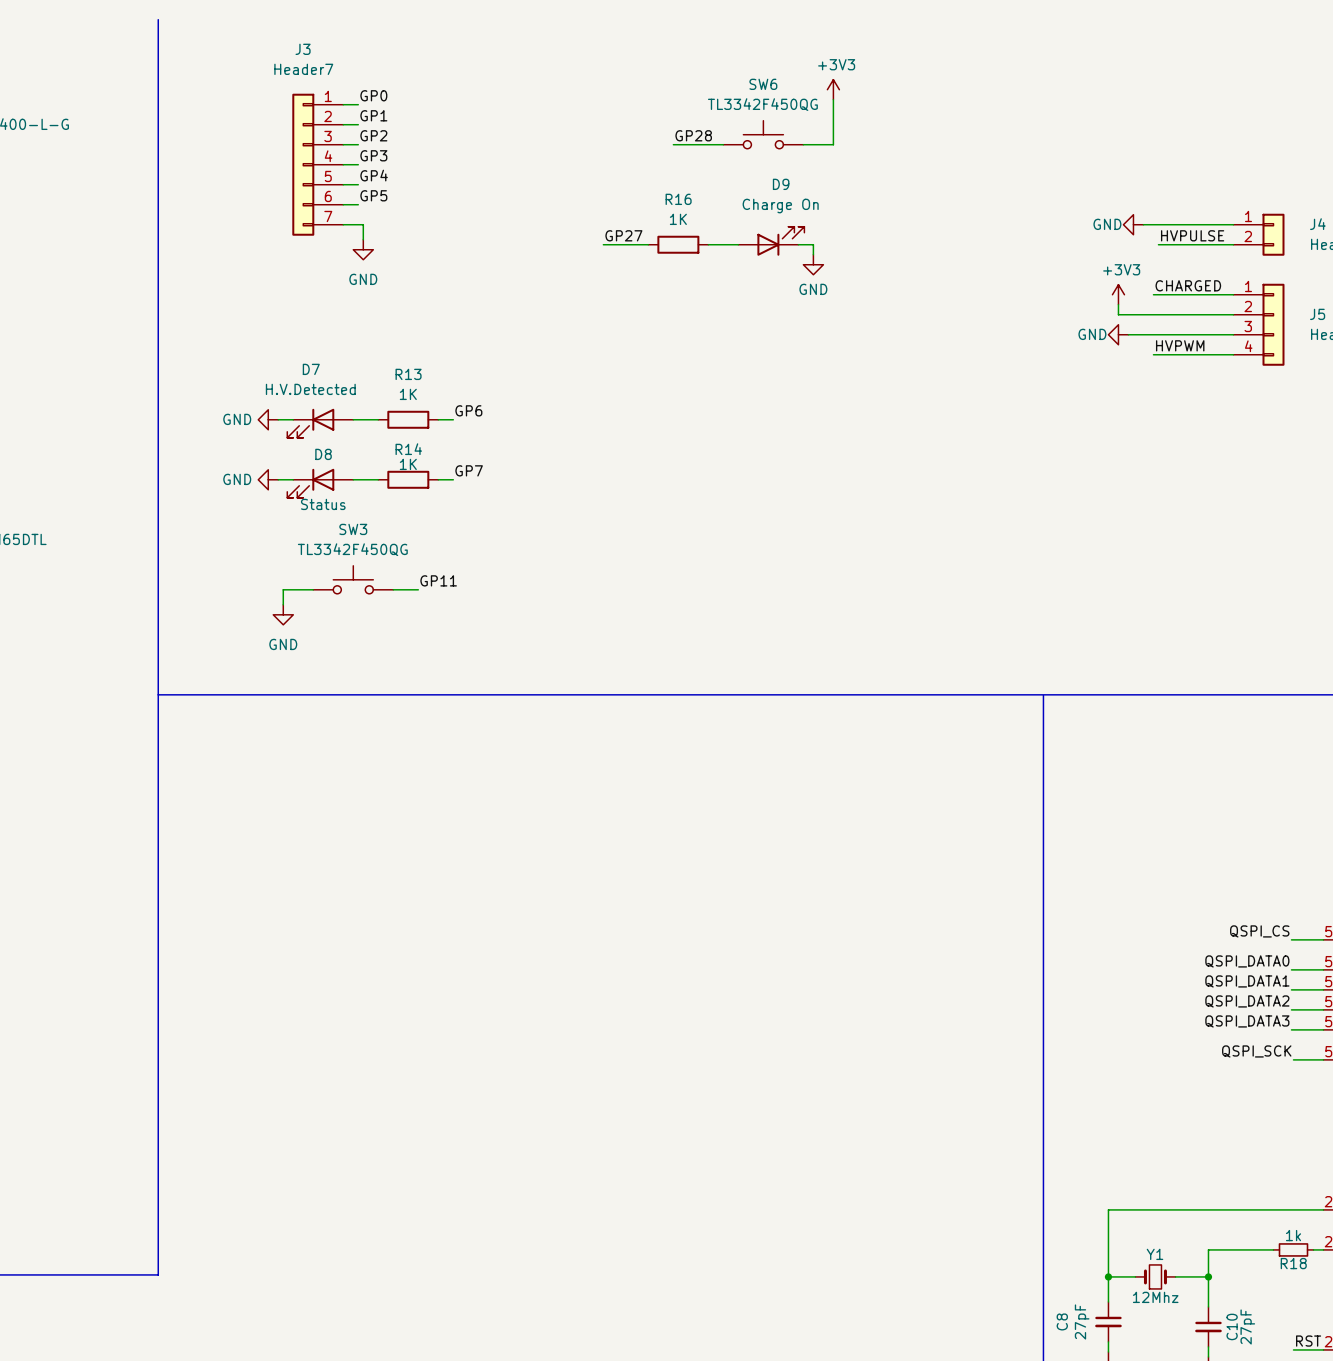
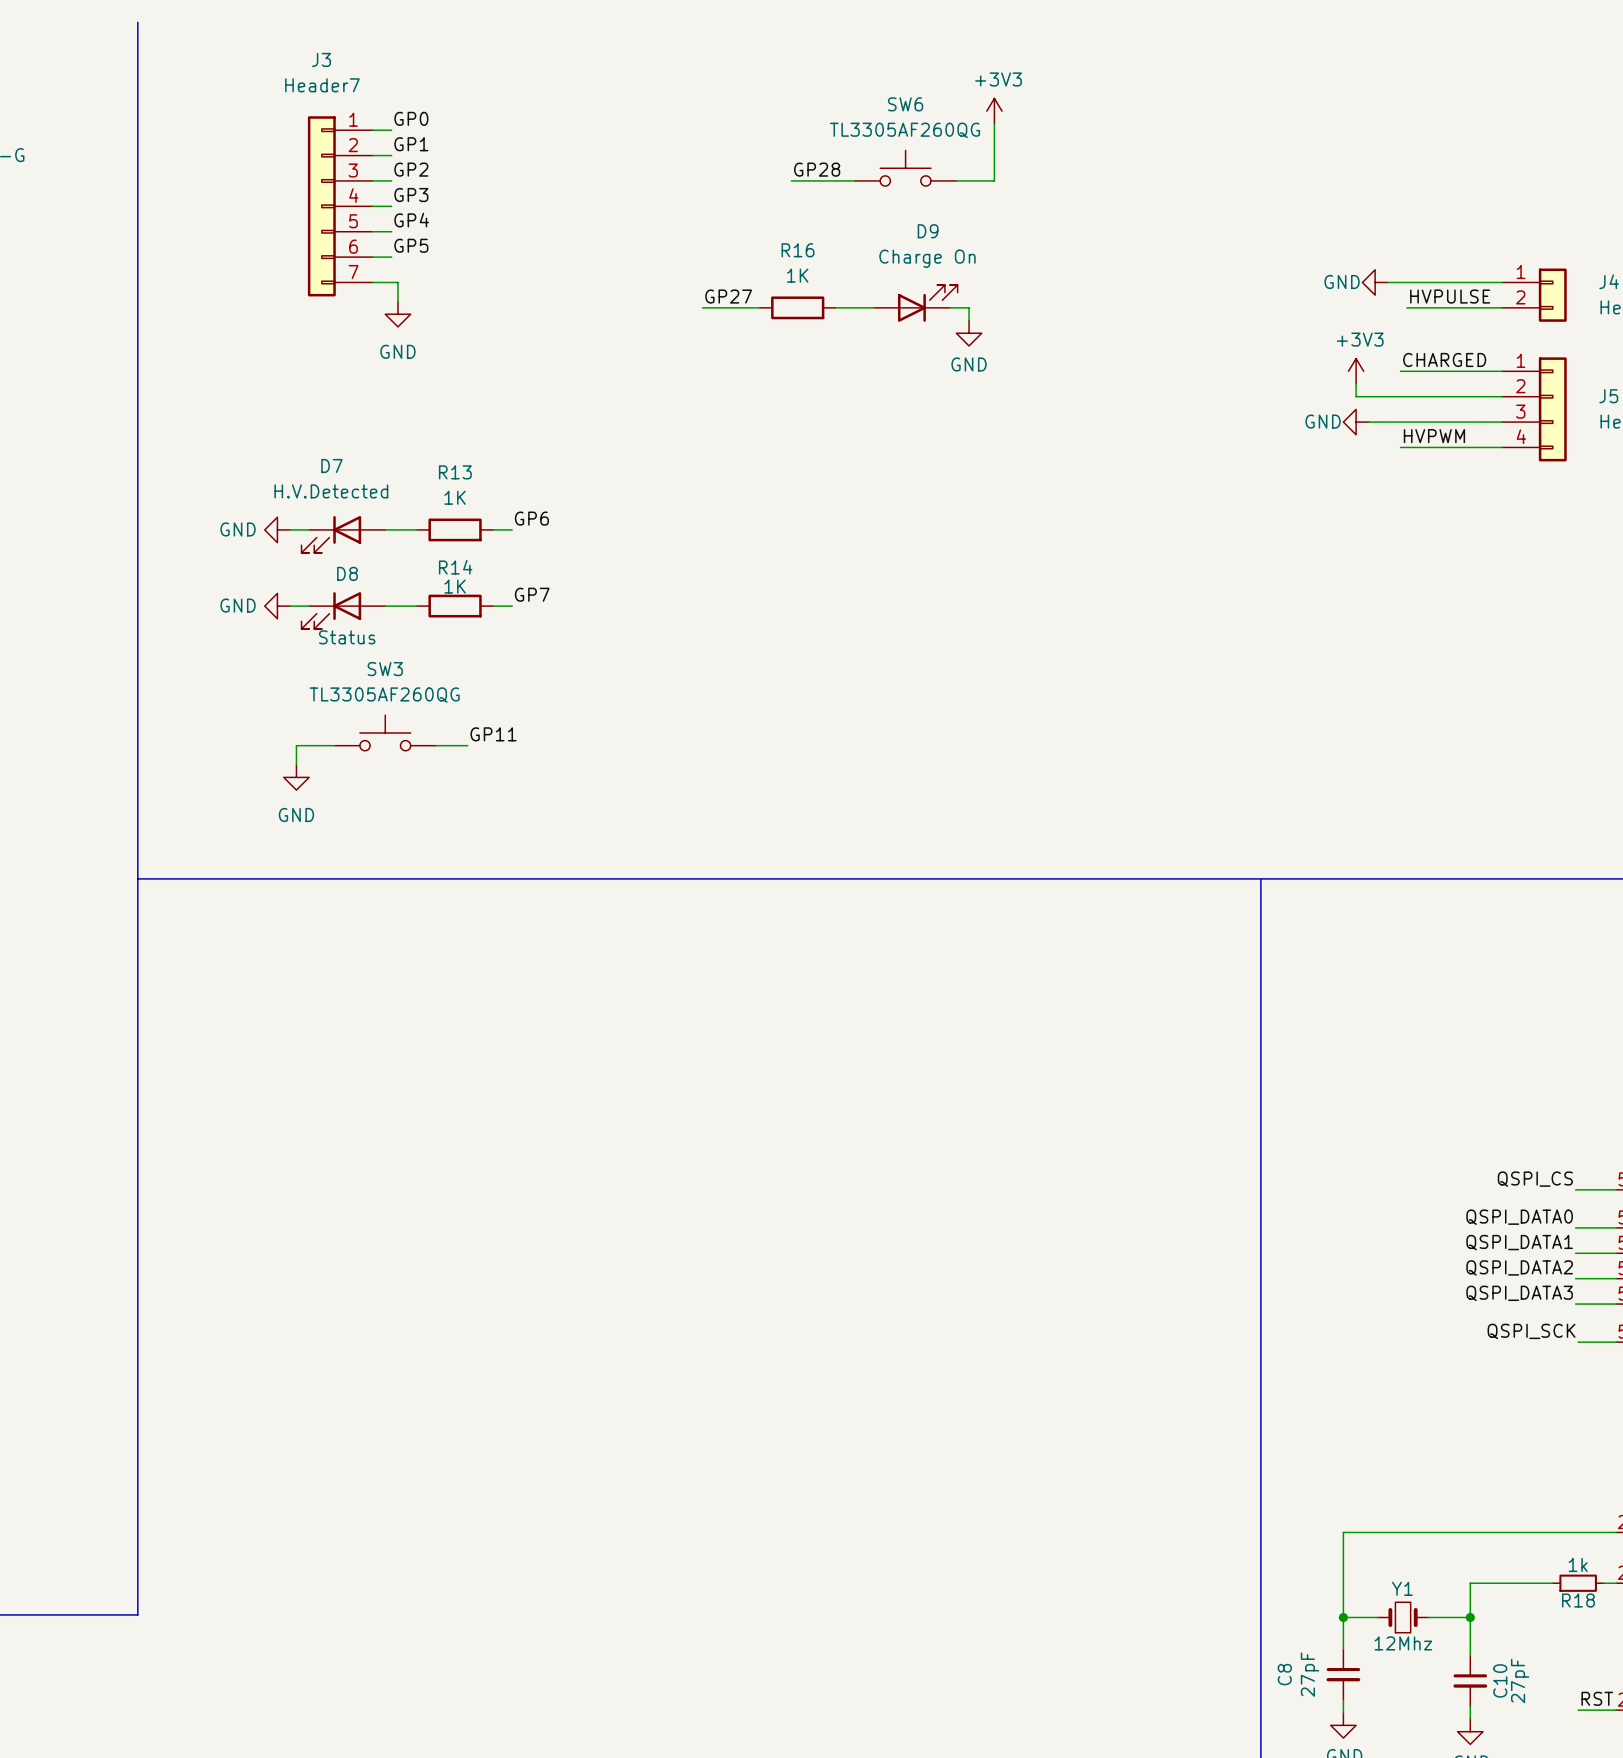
SW6 value: TL3342F450QG (762, 104) -> TL3305AF260QG (904, 130)
SW3 value: TL3342F450QG (352, 549) -> TL3305AF260QG (384, 695)

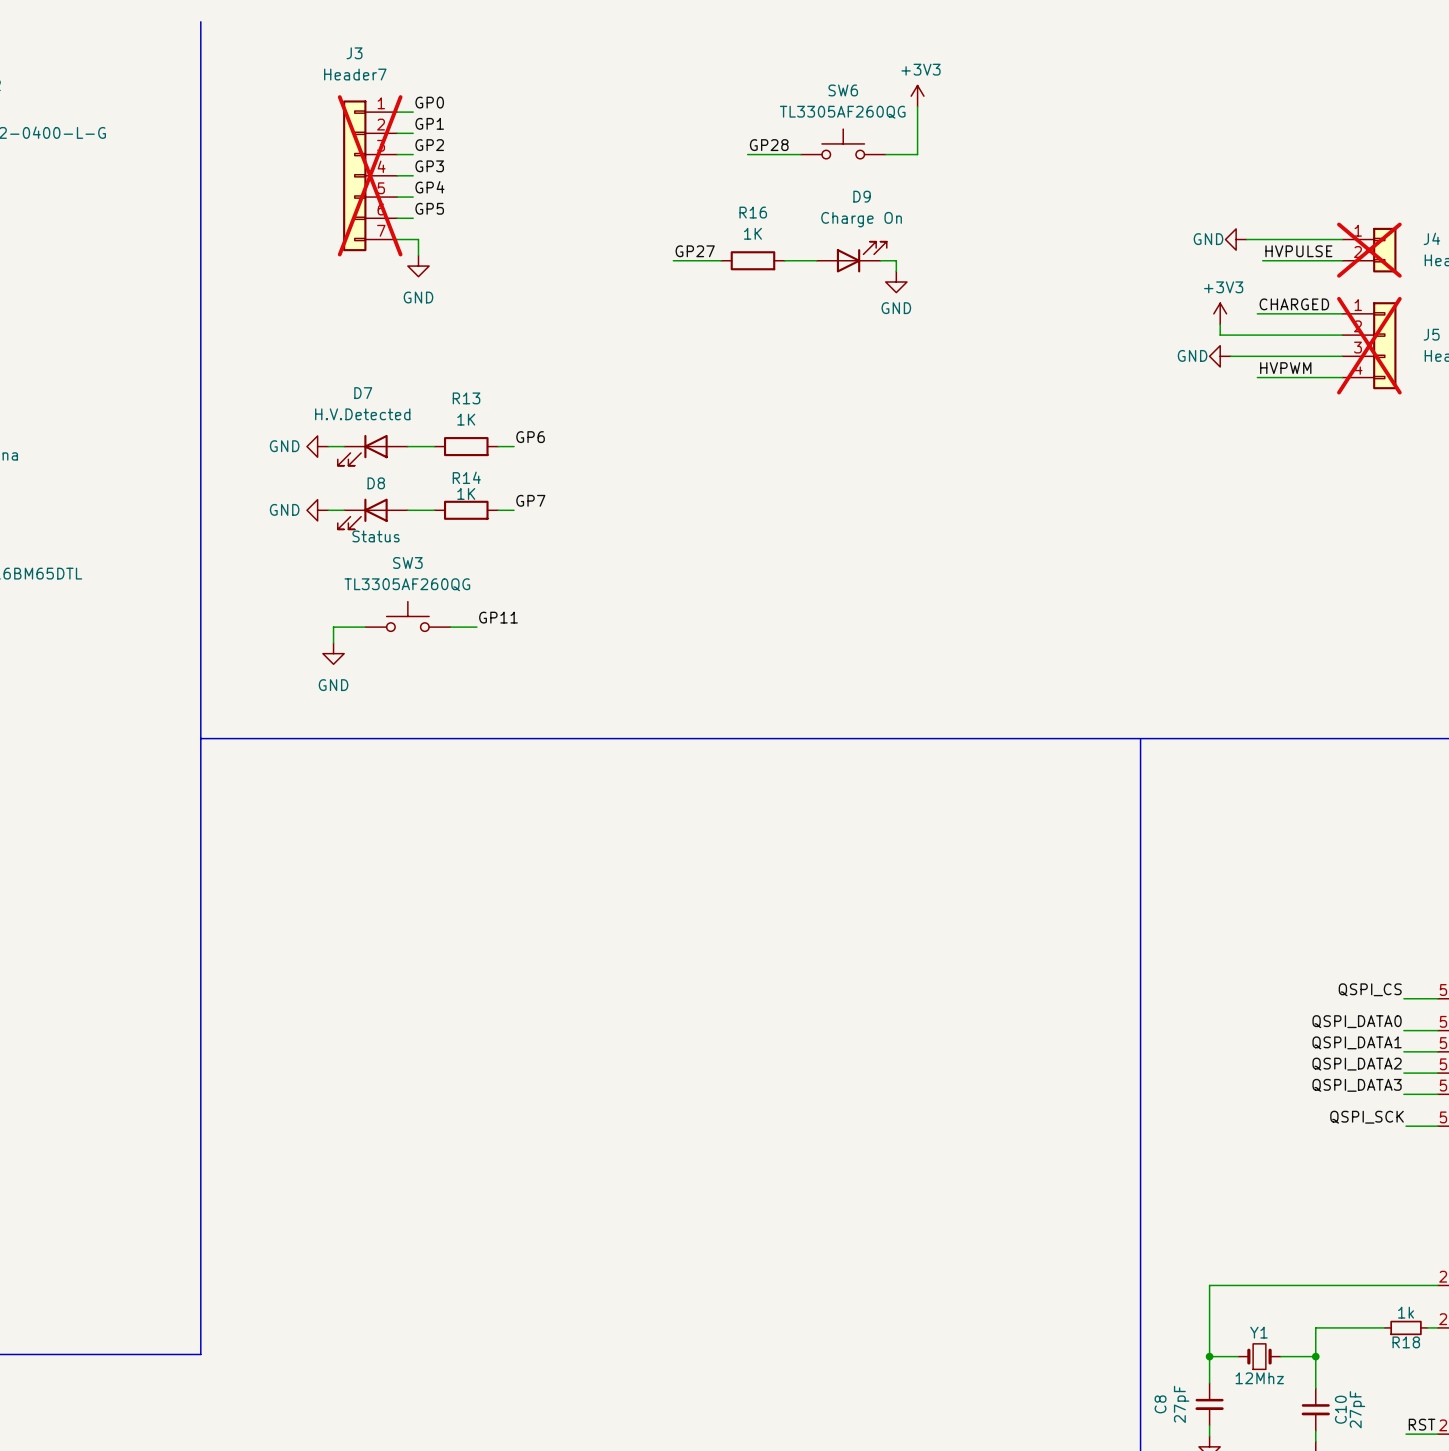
J3 do-not-place cross: none -> (370, 175)
J4 do-not-place cross: none -> (1369, 250)
J5 do-not-place cross: none -> (1369, 345)

